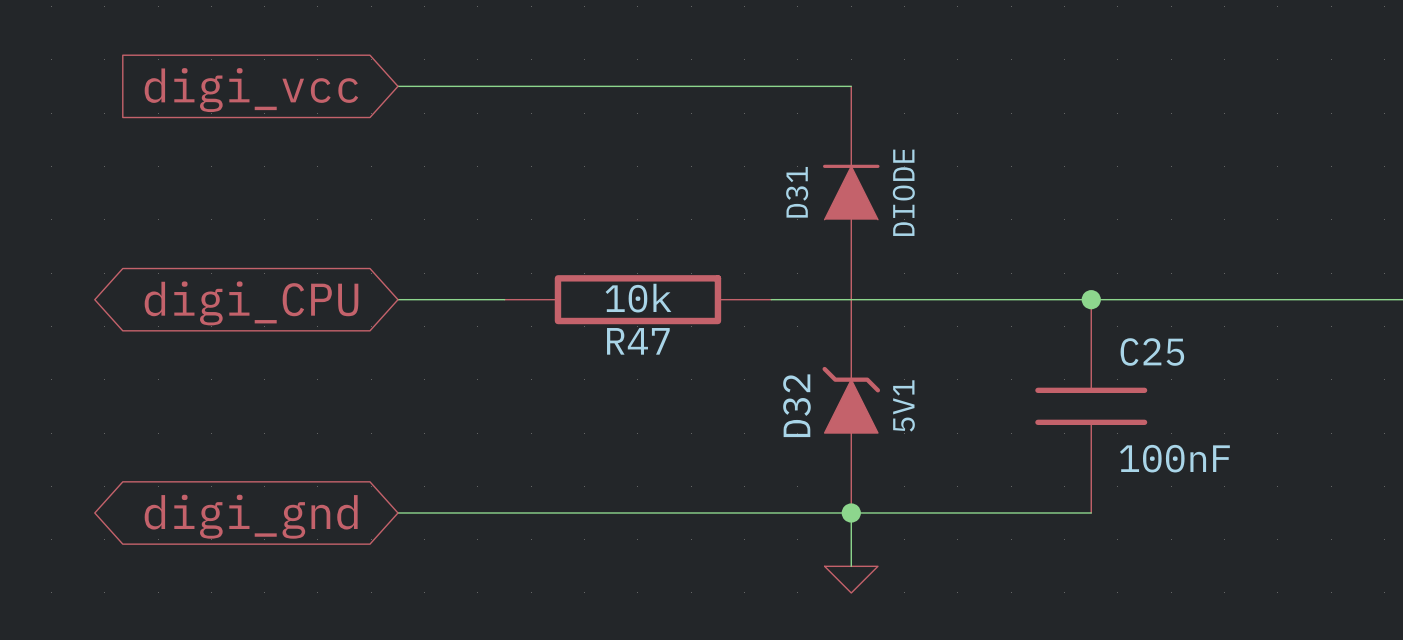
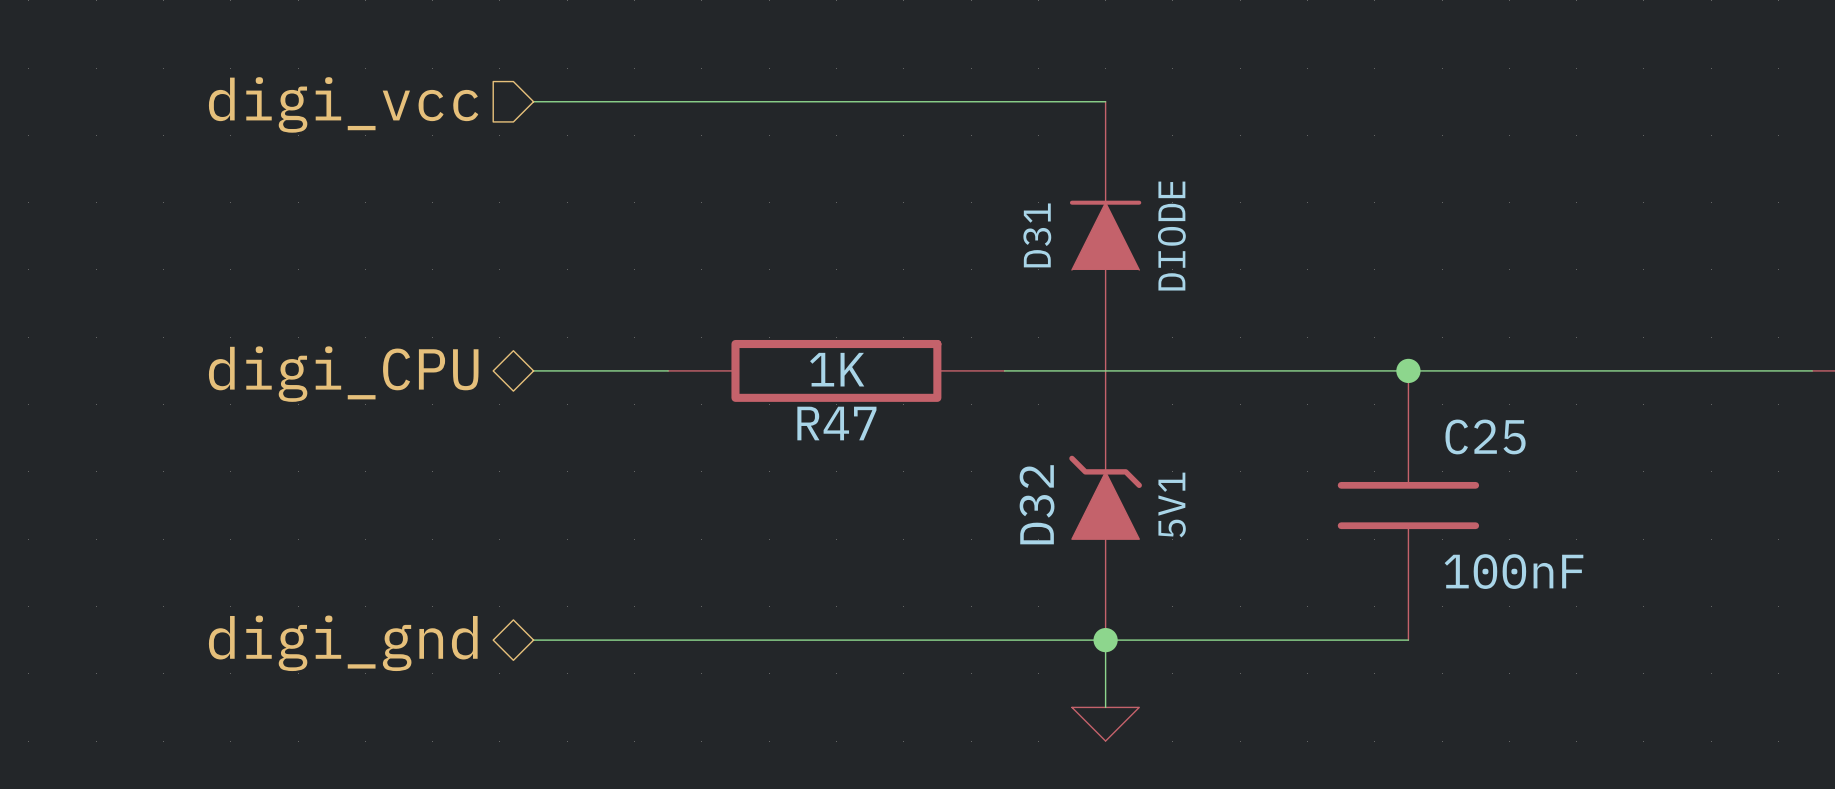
hierarchical label: none -> digi_vcc (343, 104)
global label: digi_vcc (251, 90) -> none
R47 value: 10k (638, 298) -> 1K (837, 369)
hierarchical label: none -> digi_CPU (343, 374)
global label: digi_CPU (251, 303) -> none
hierarchical label: none -> digi_gnd (343, 643)
global label: digi_gnd (251, 516) -> none

